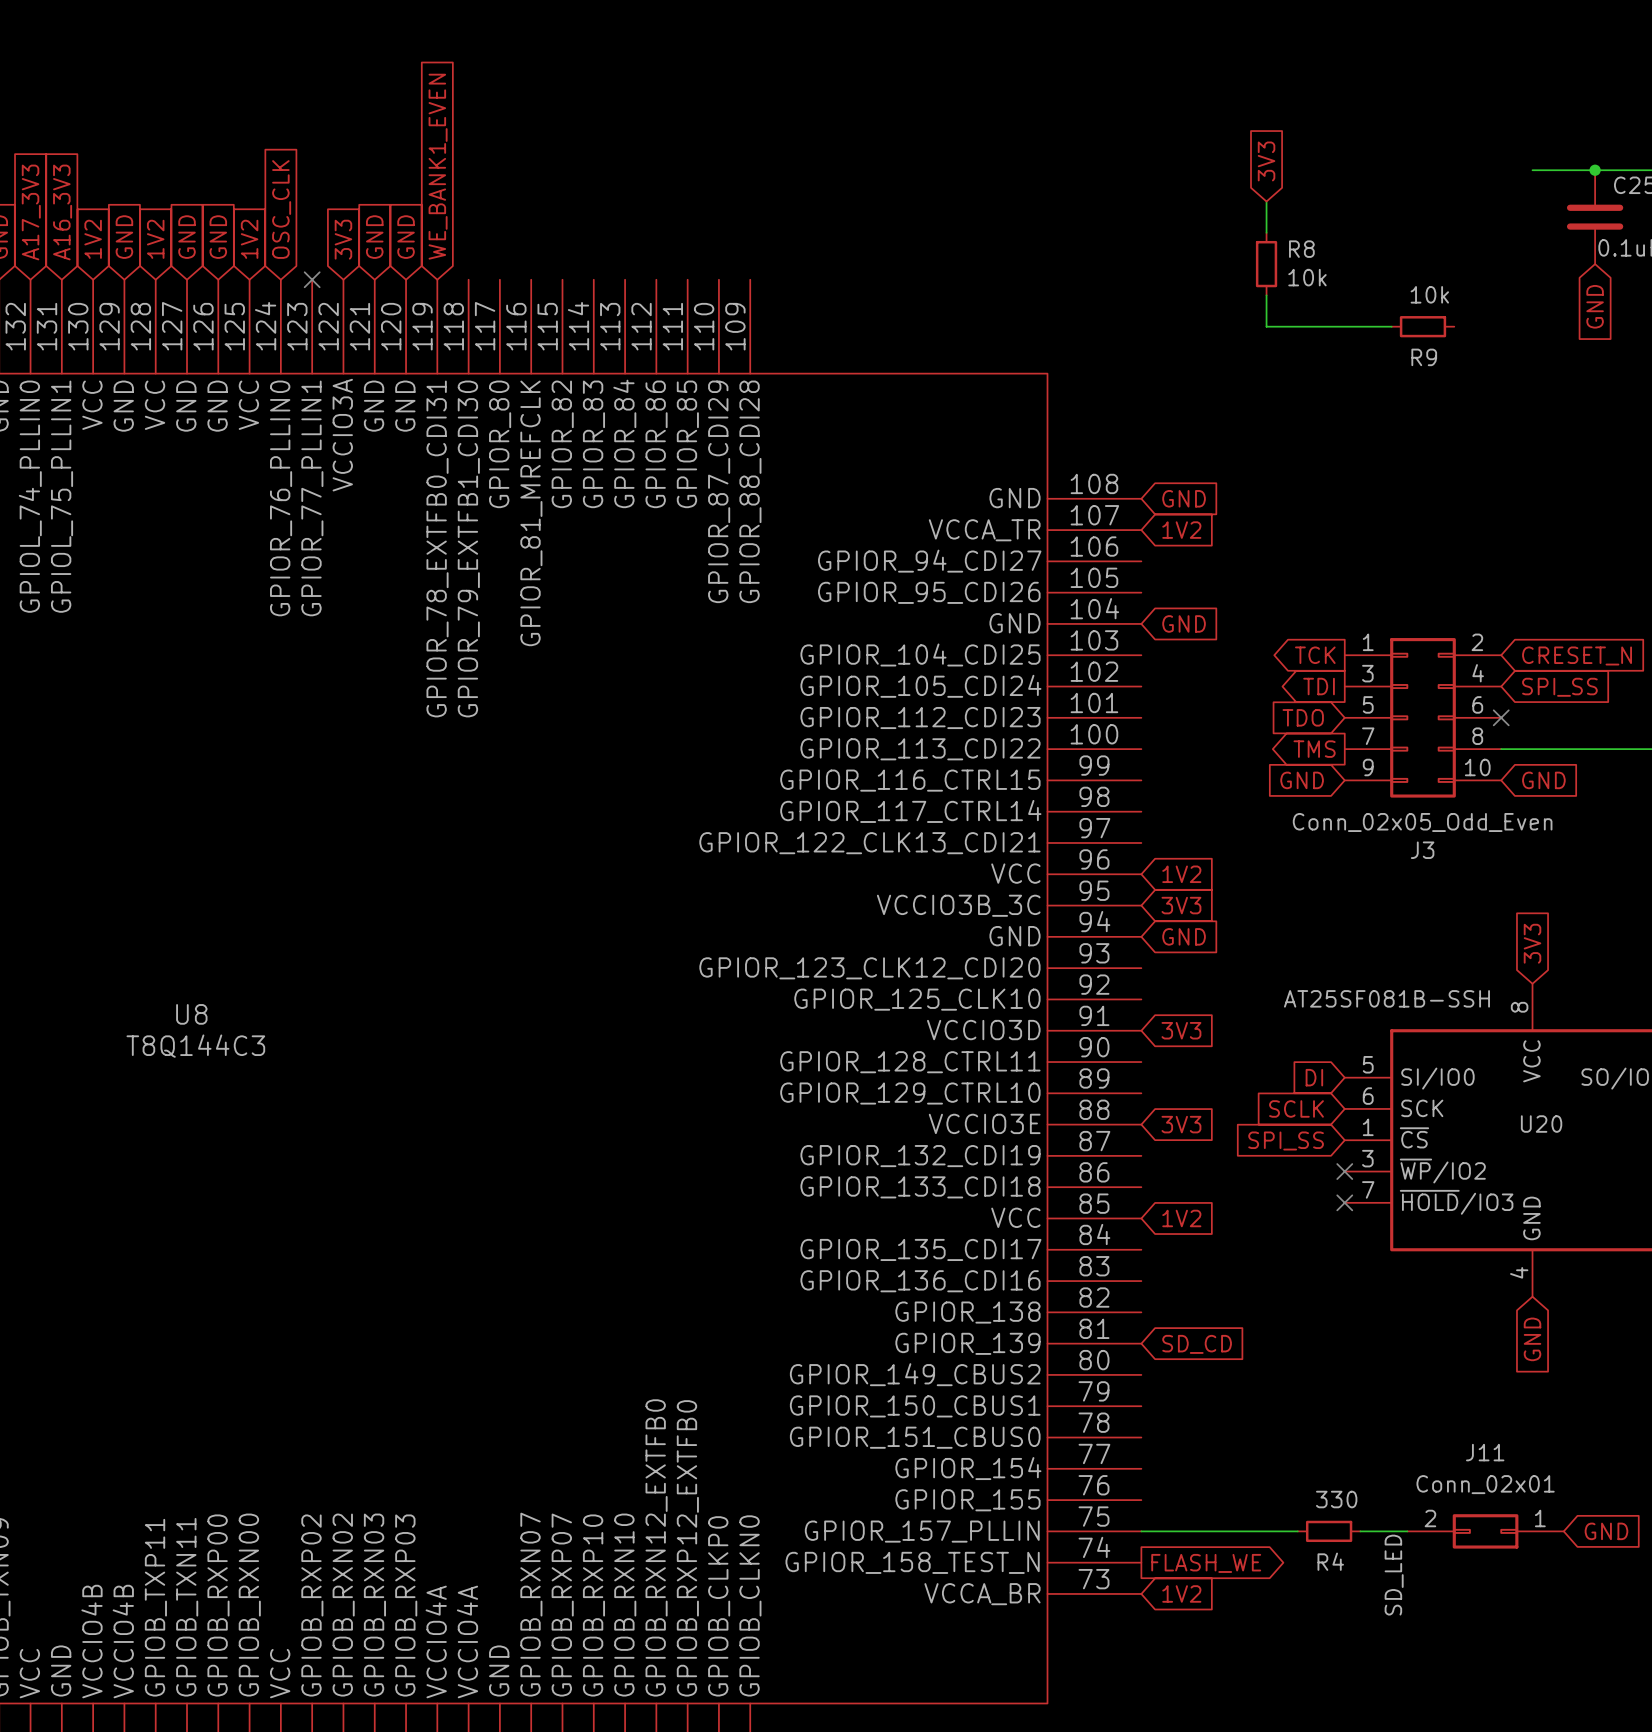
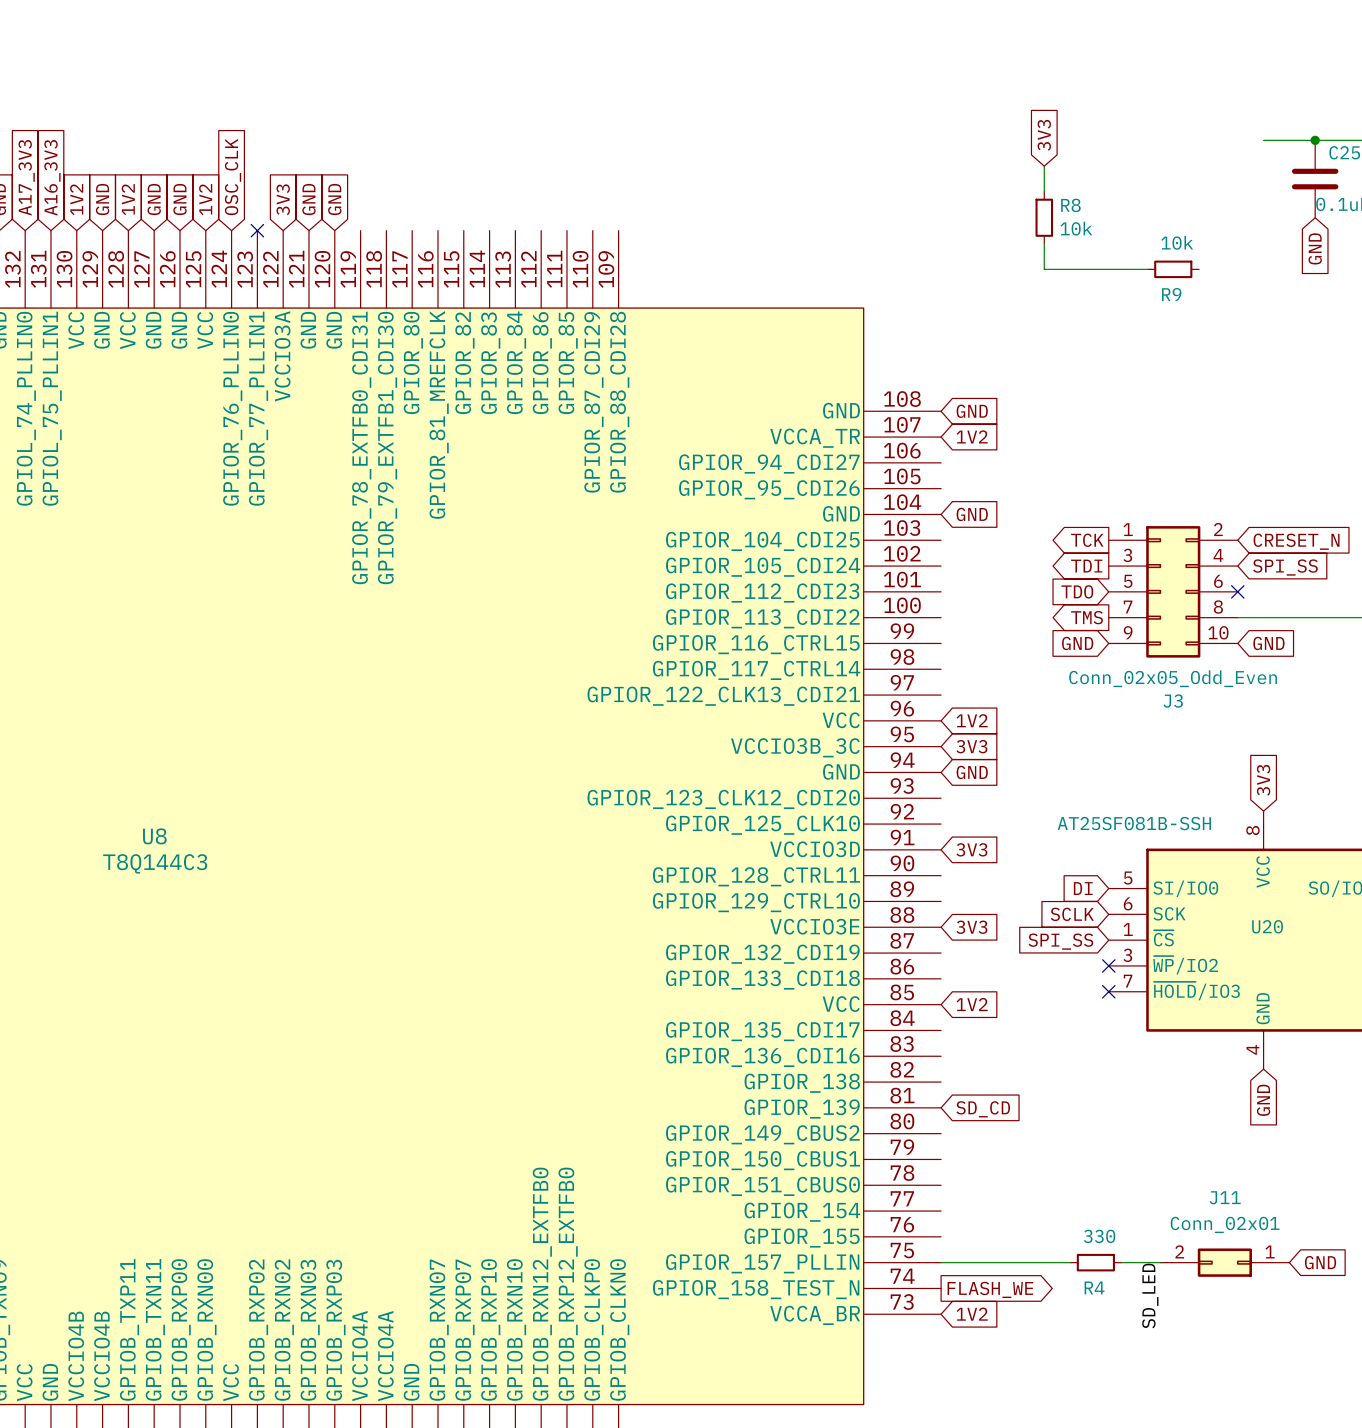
global label: WE_BANK1_EVEN (438, 166) -> none

